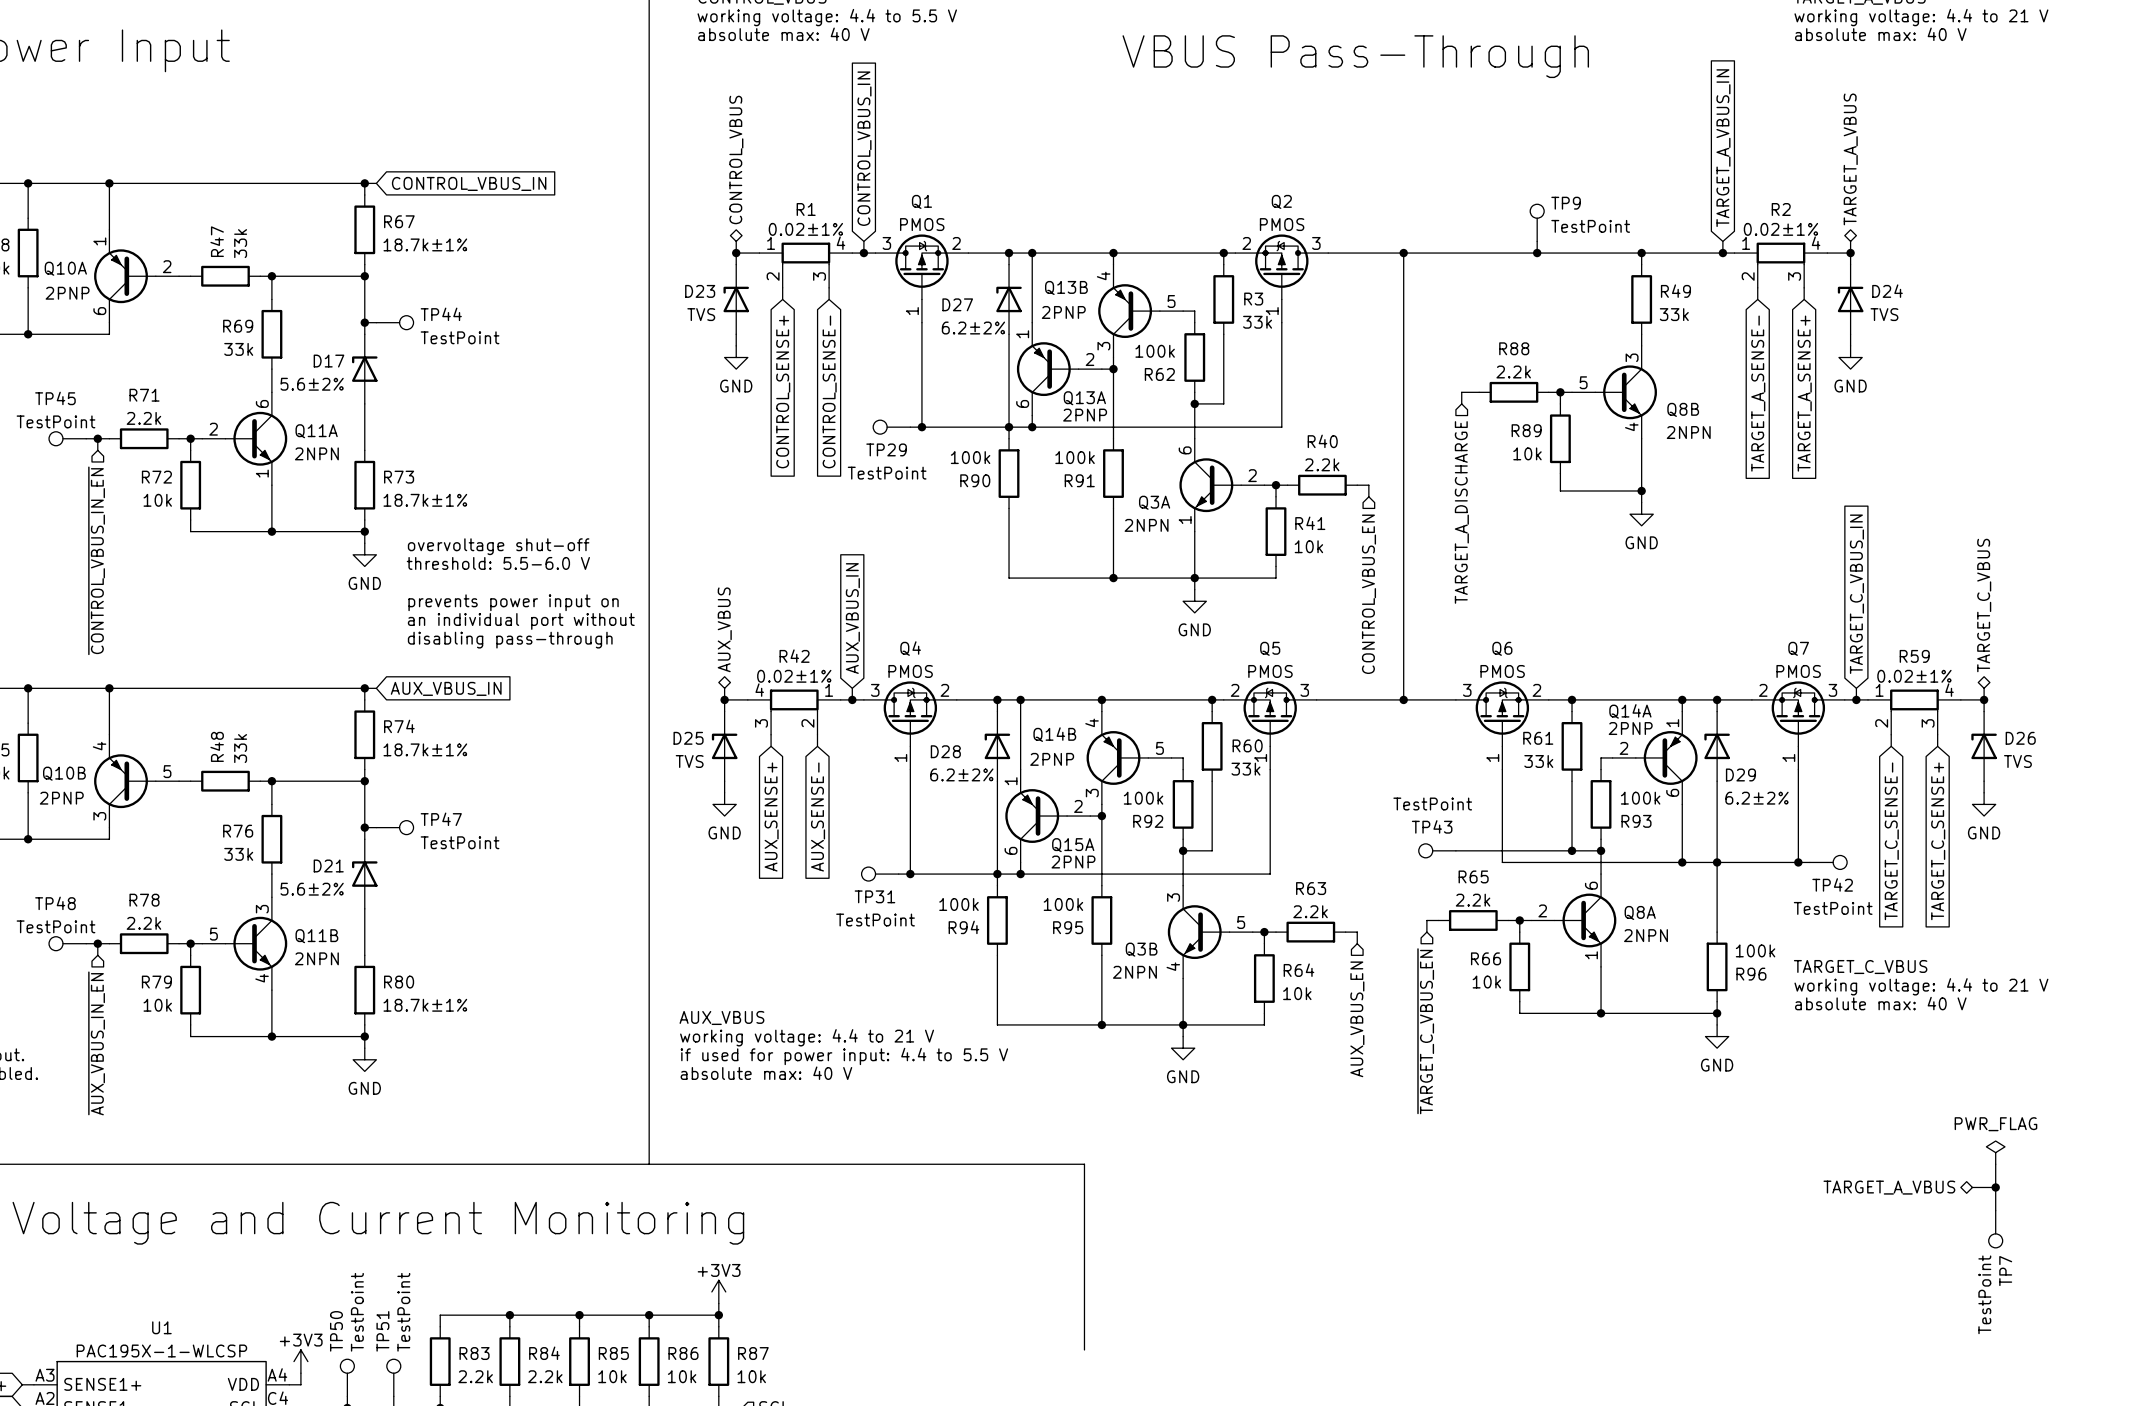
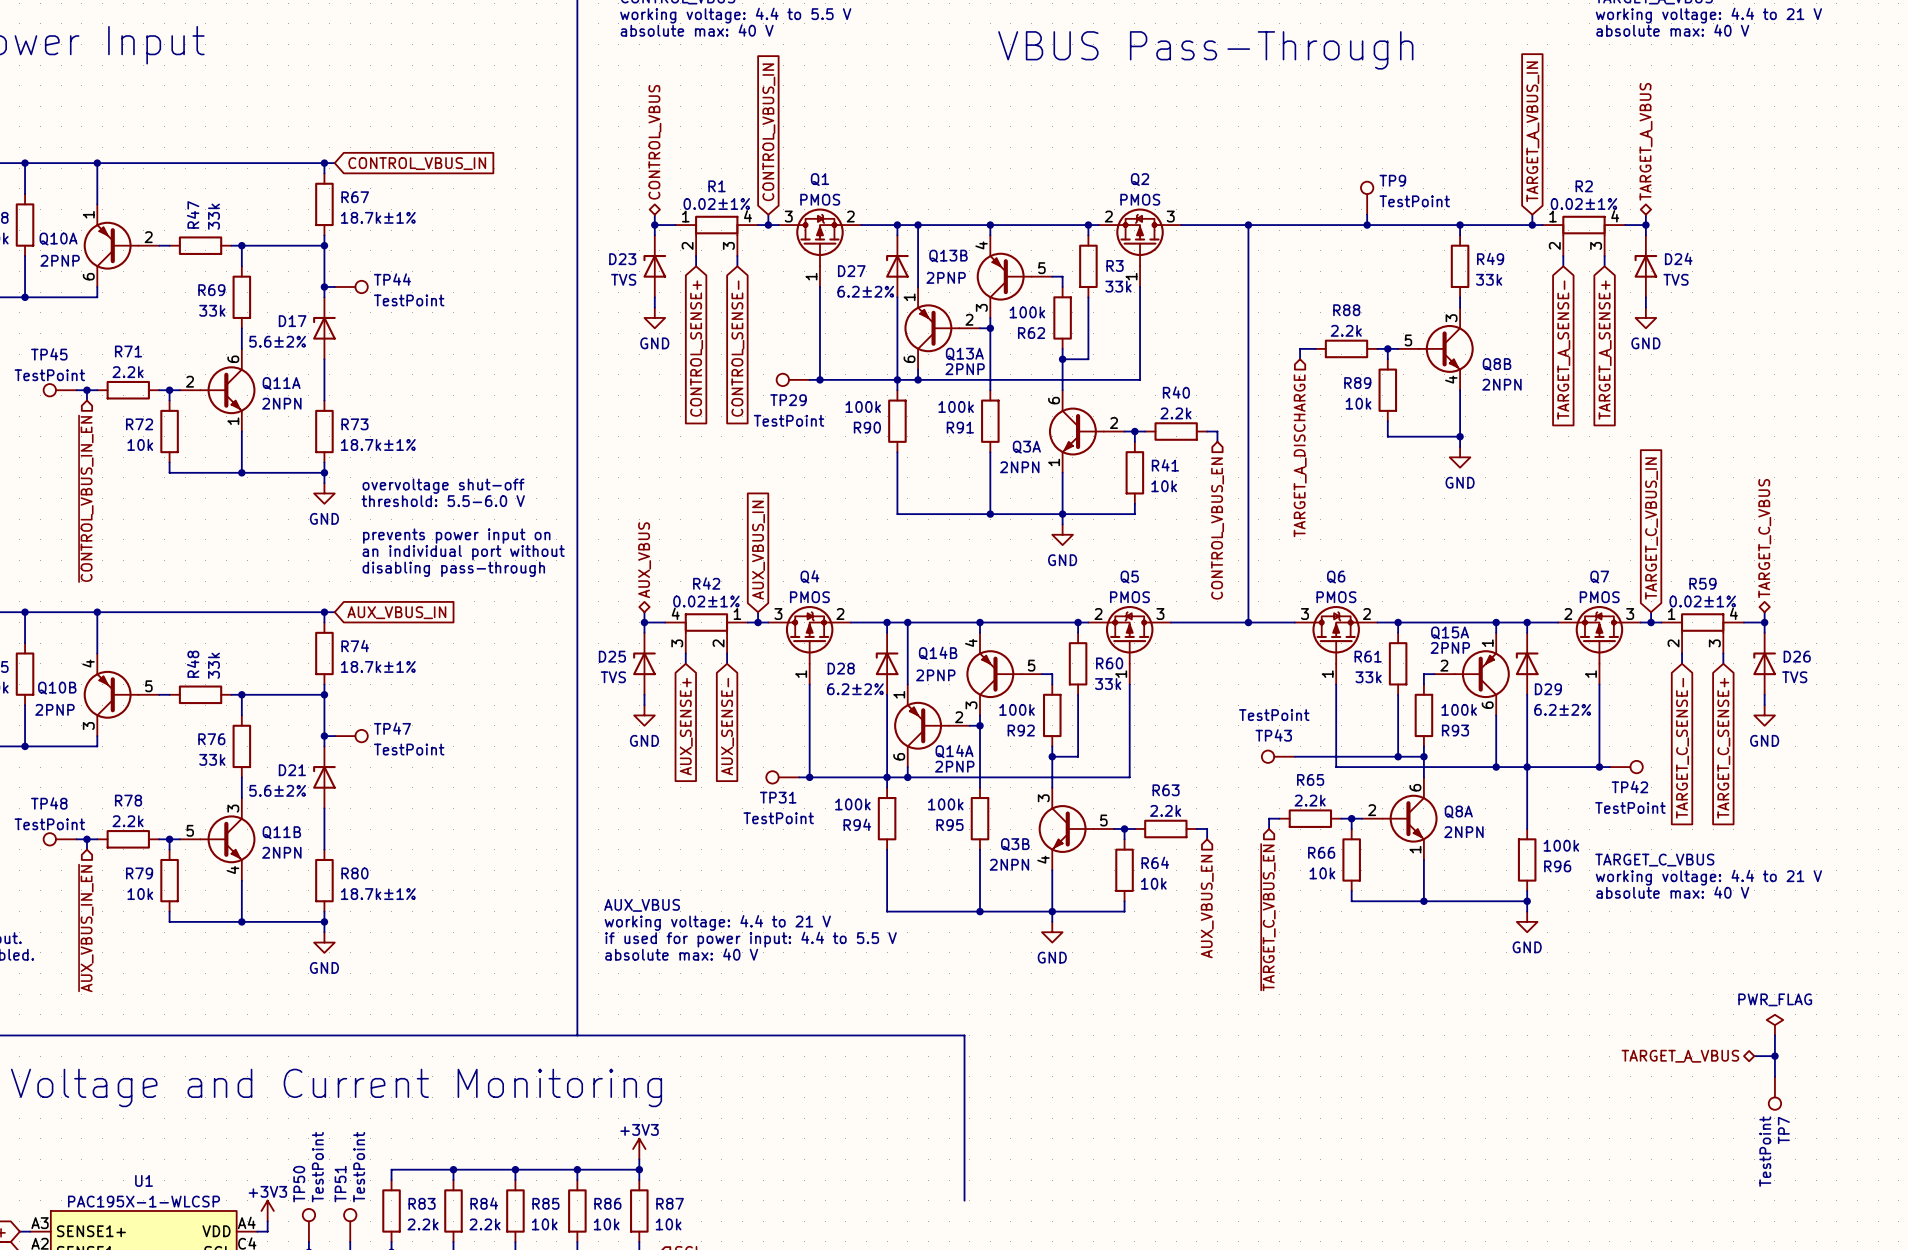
Q14A name: Q14A (1630, 711) -> Q15A (1450, 632)
Q15A name: Q15A (1073, 845) -> Q14A (954, 751)

